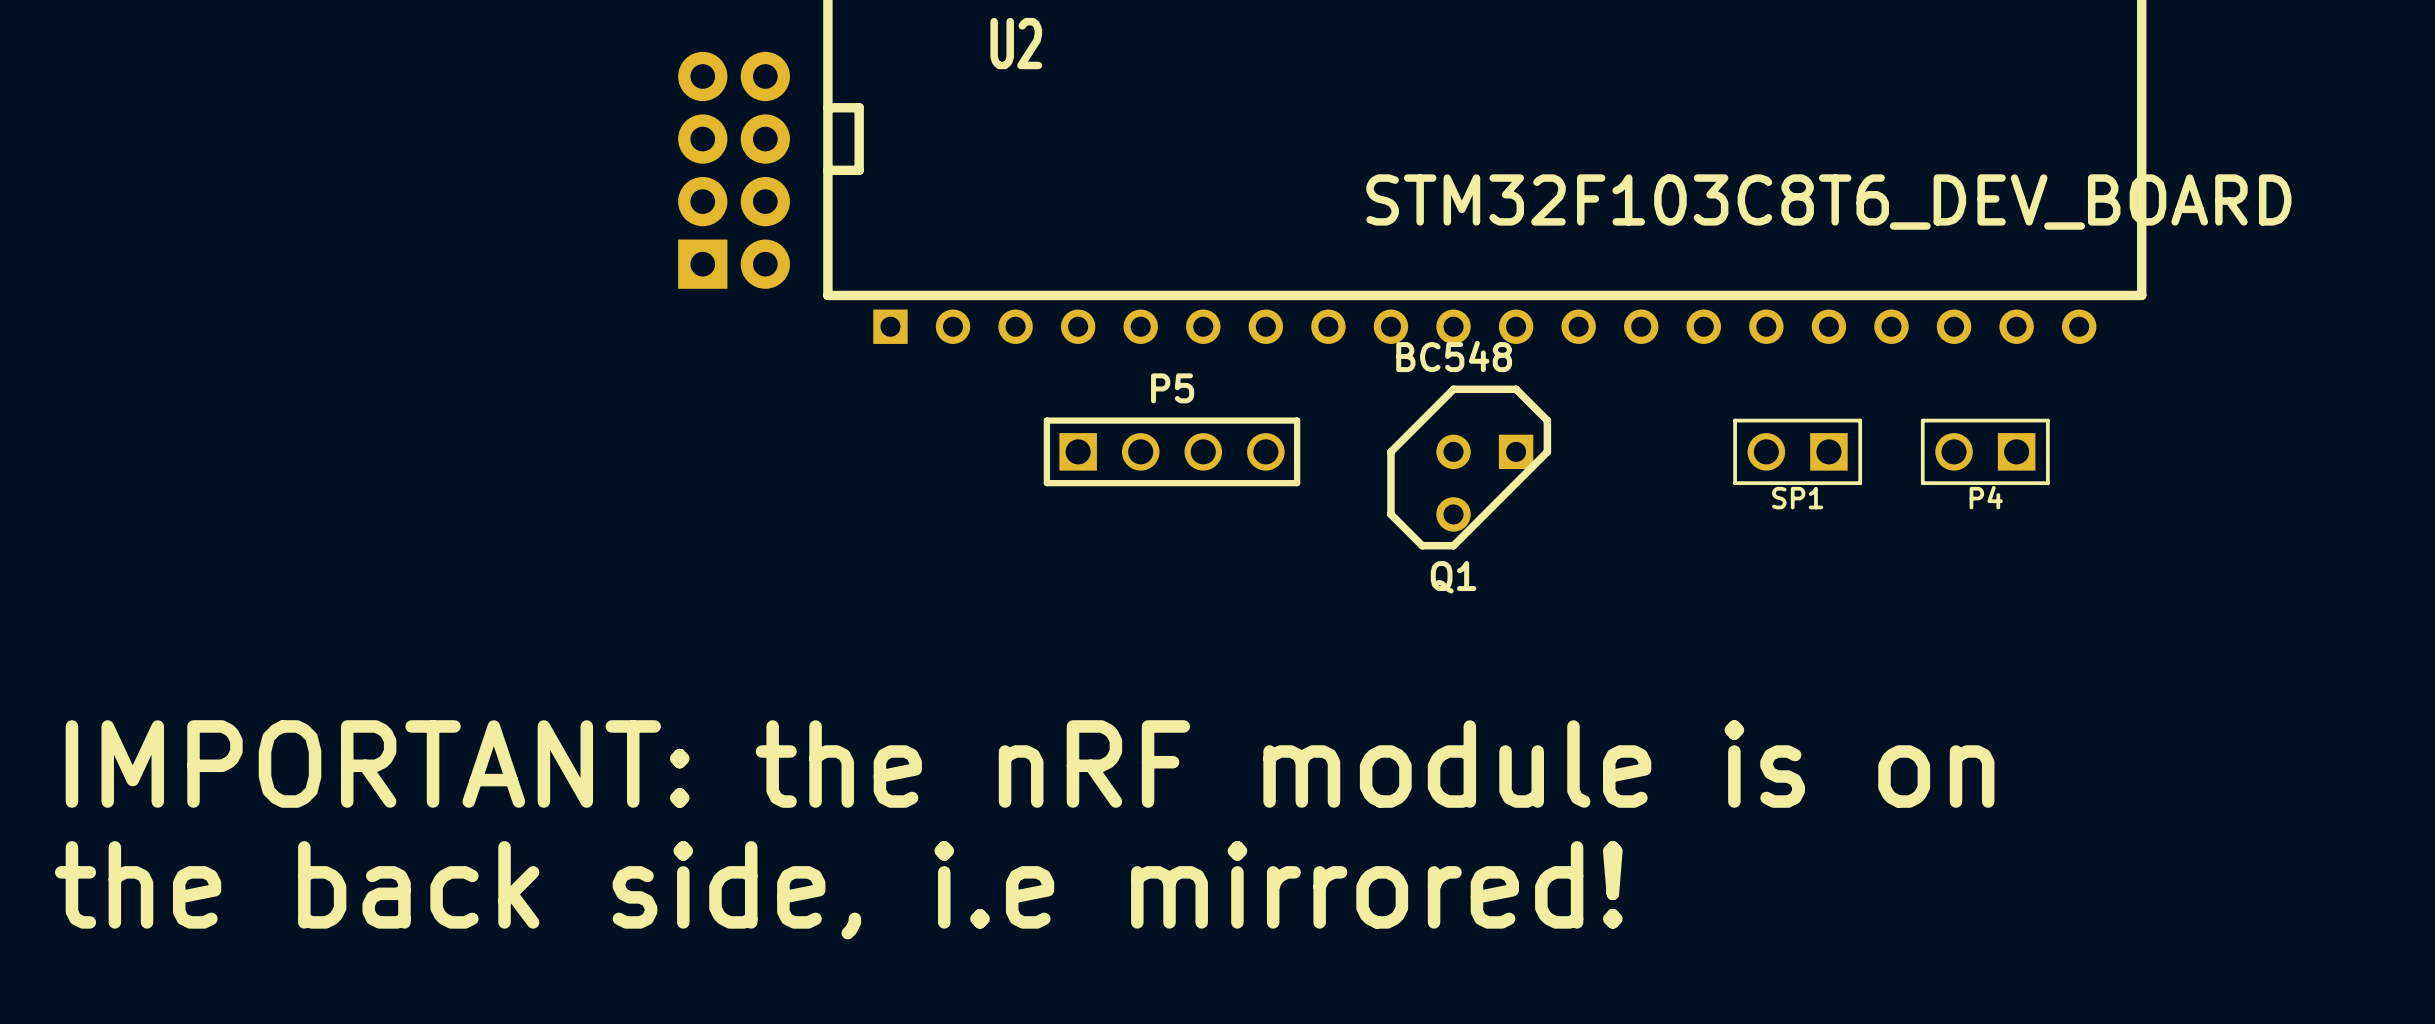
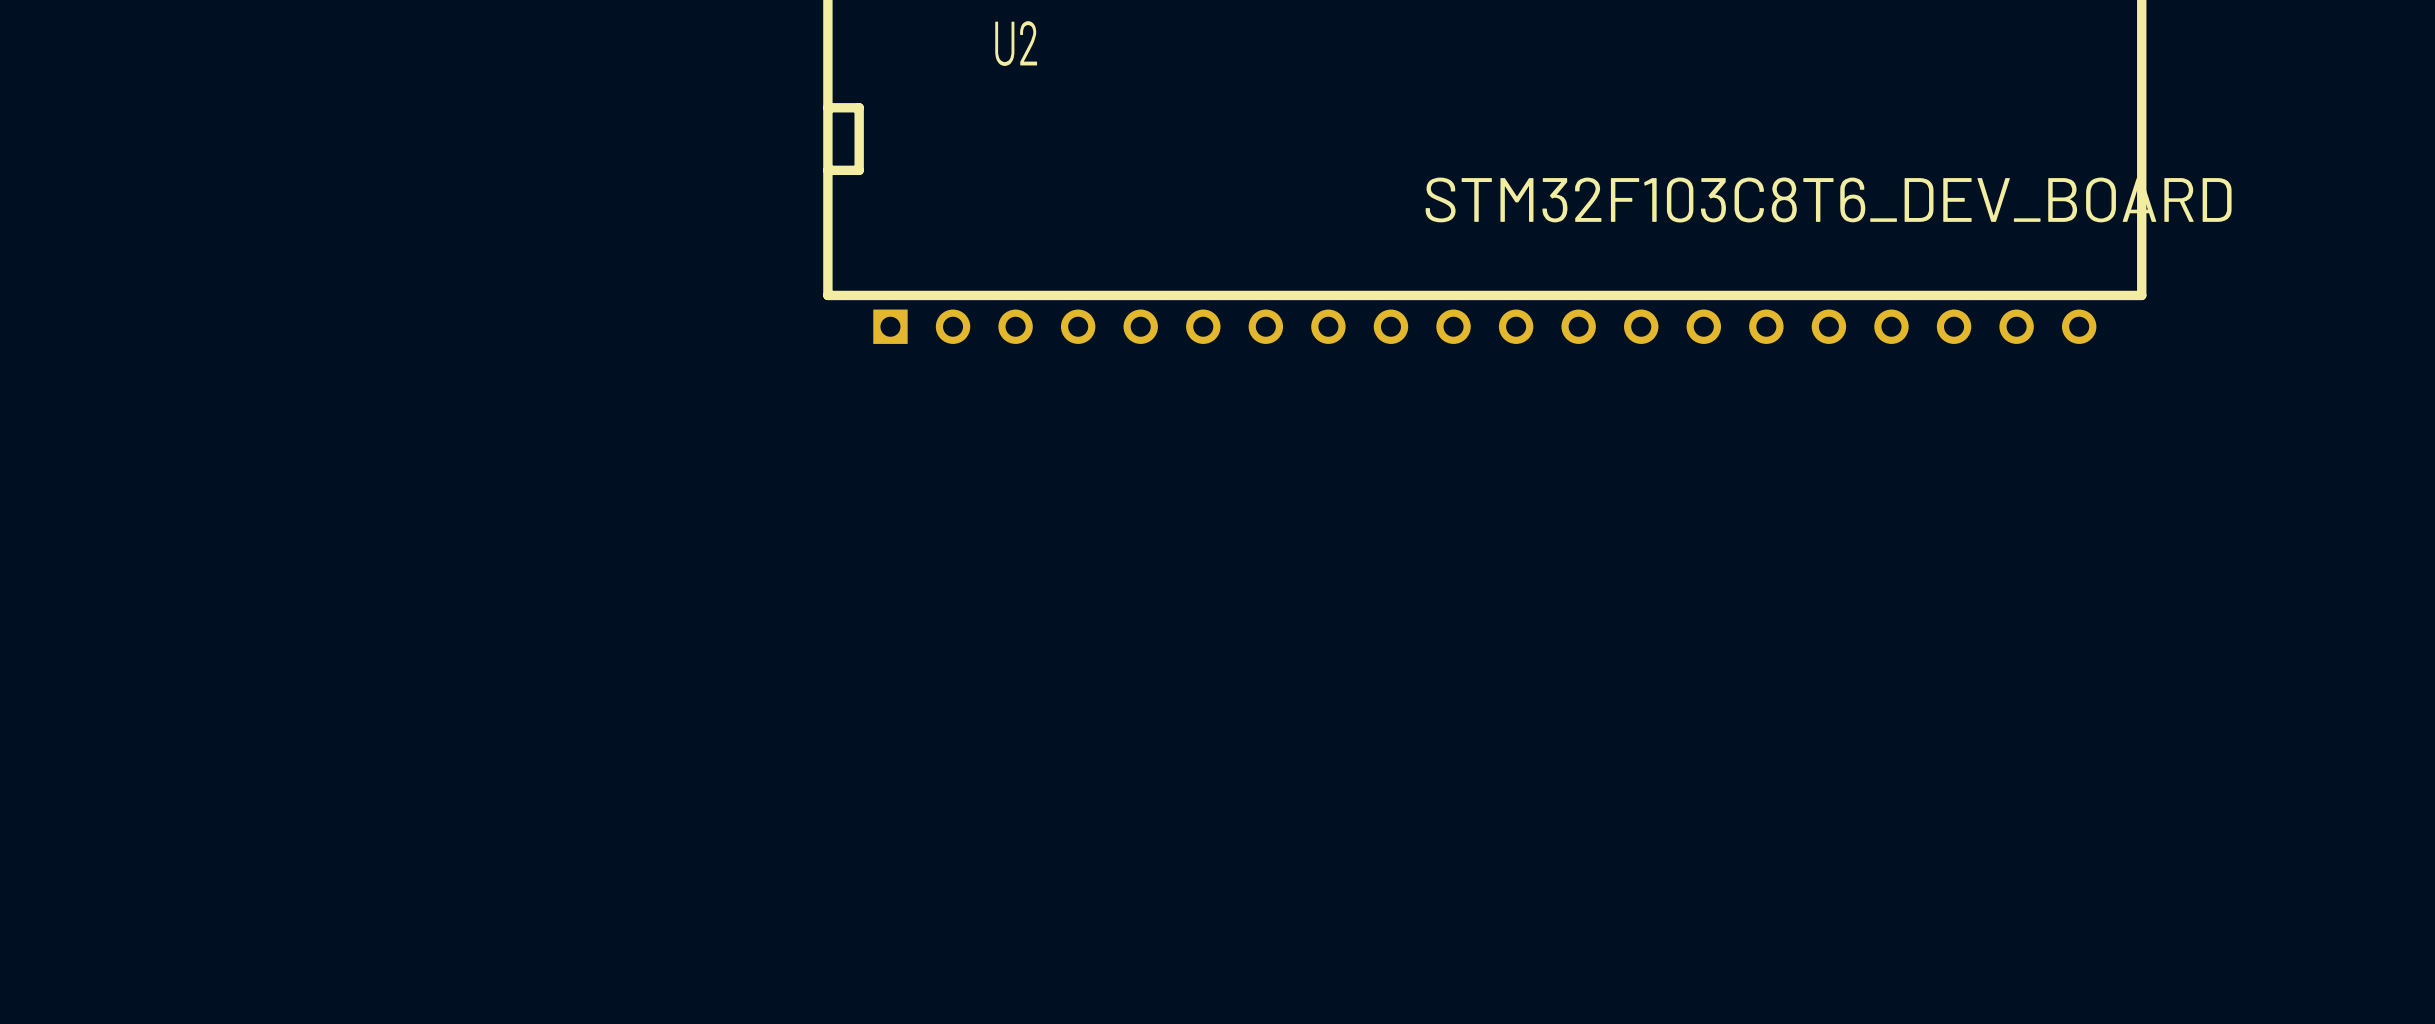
part: (734, 170) -> none
P5: (1172, 451) -> none
SP1: (1797, 451) -> none
P4: (1985, 451) -> none
Q1: BC548 (1469, 467) -> none
text: IMPORTANT: the nRF module is on (1030, 764) -> none
text: the back side, i.e mirrored! (838, 890) -> none

